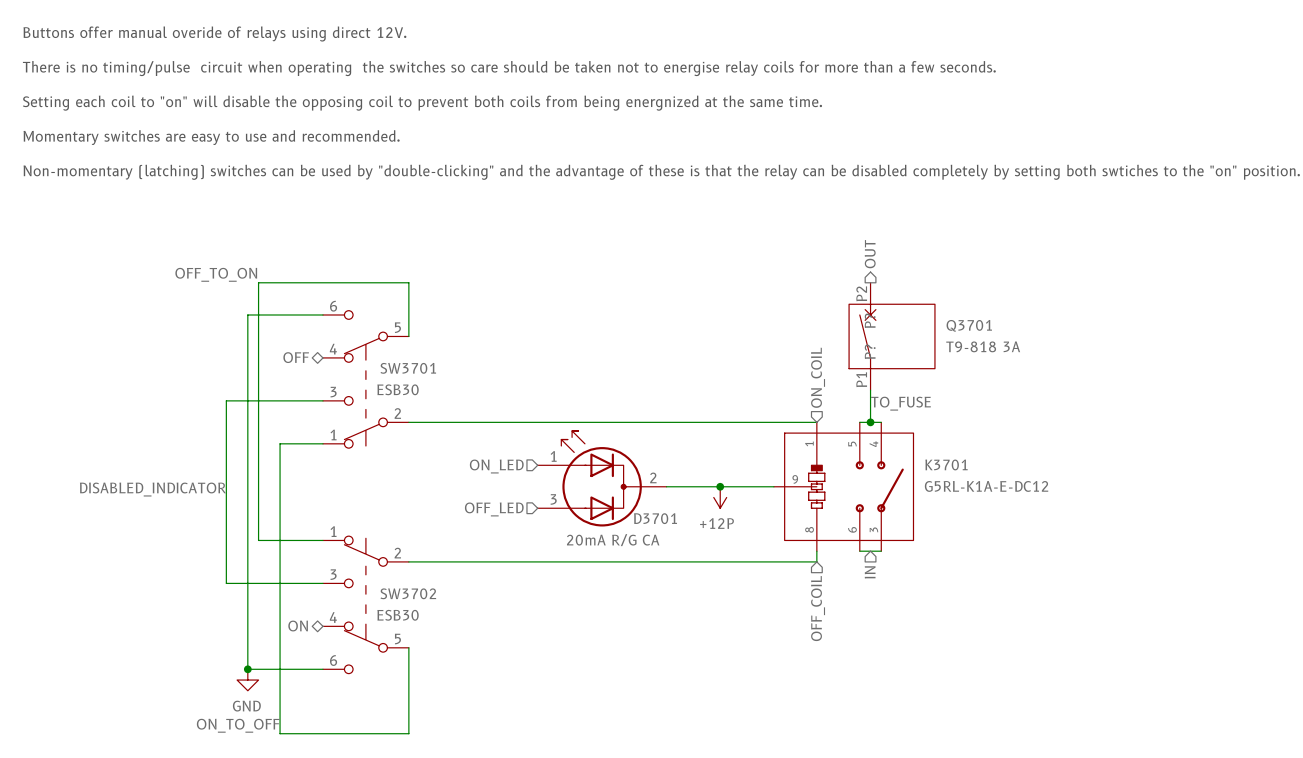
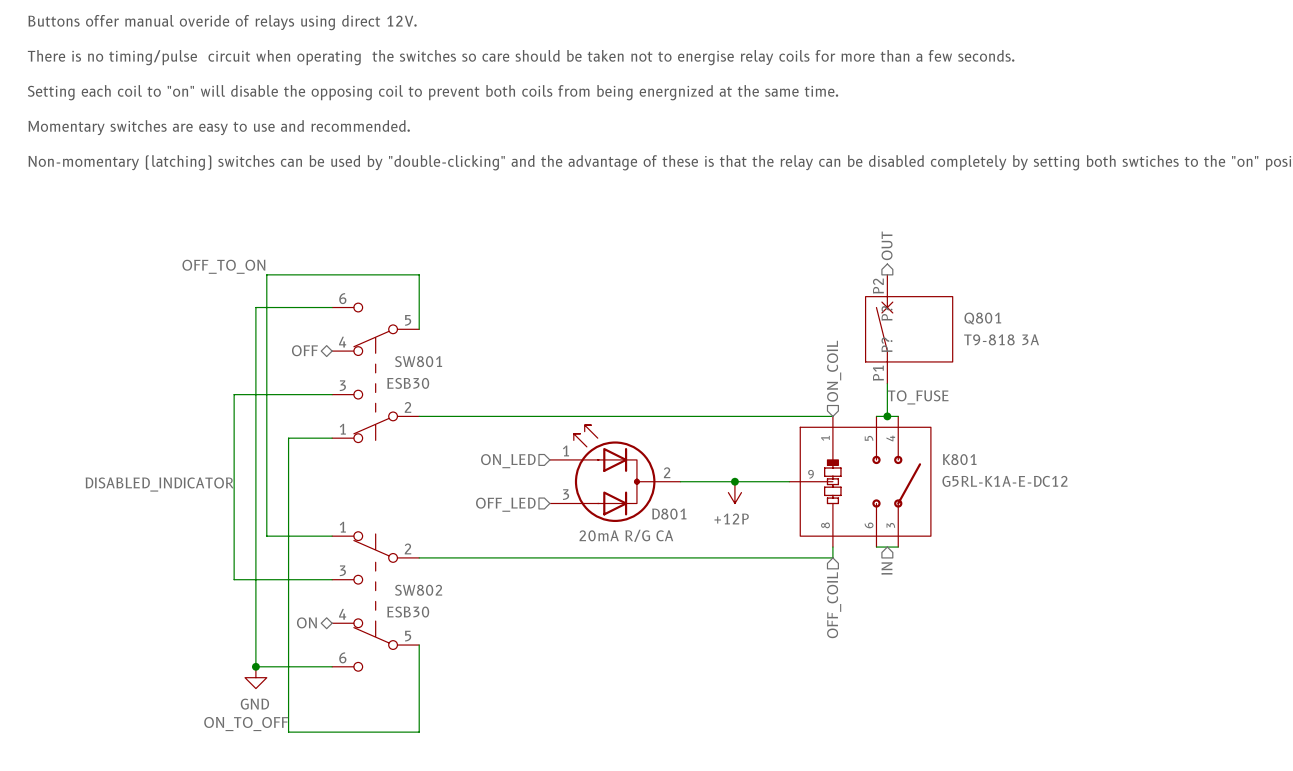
Q3701 name: Q3701 (969, 325) -> Q801 (982, 318)
SW3701 name: SW3701 (408, 368) -> SW801 (418, 361)
K3701 name: K3701 (946, 464) -> K801 (959, 459)
D3701 name: D3701 (655, 518) -> D801 (669, 514)
SW3702 name: SW3702 (408, 593) -> SW802 (418, 590)

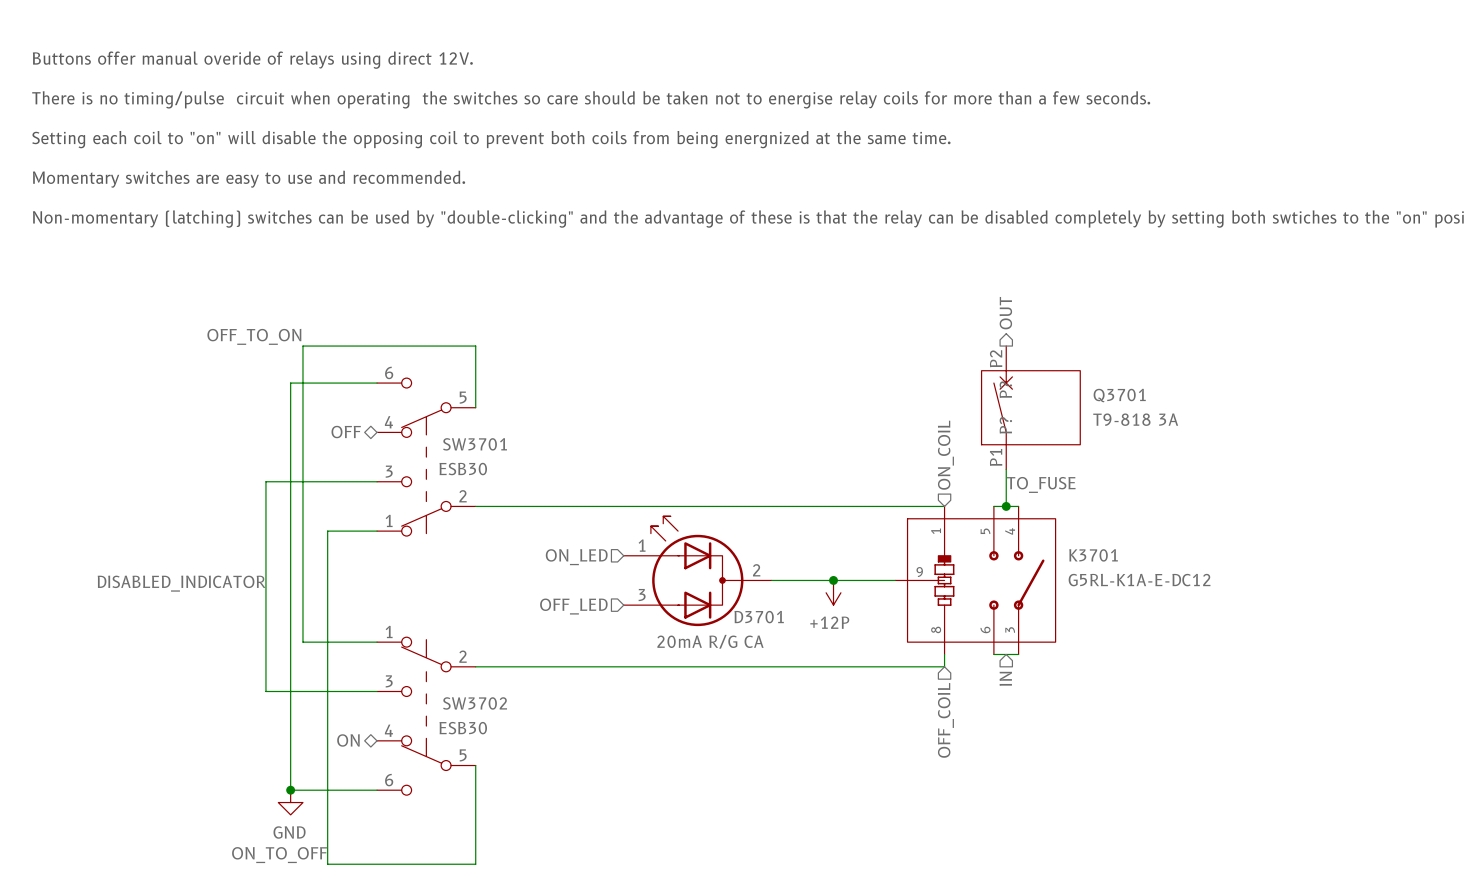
Q801 name: Q801 (982, 318) -> Q3701 (1119, 395)
SW801 name: SW801 (418, 361) -> SW3701 (475, 444)
K801 name: K801 (959, 459) -> K3701 (1093, 555)
D801 name: D801 (669, 514) -> D3701 (759, 617)
SW802 name: SW802 (418, 590) -> SW3702 (475, 703)

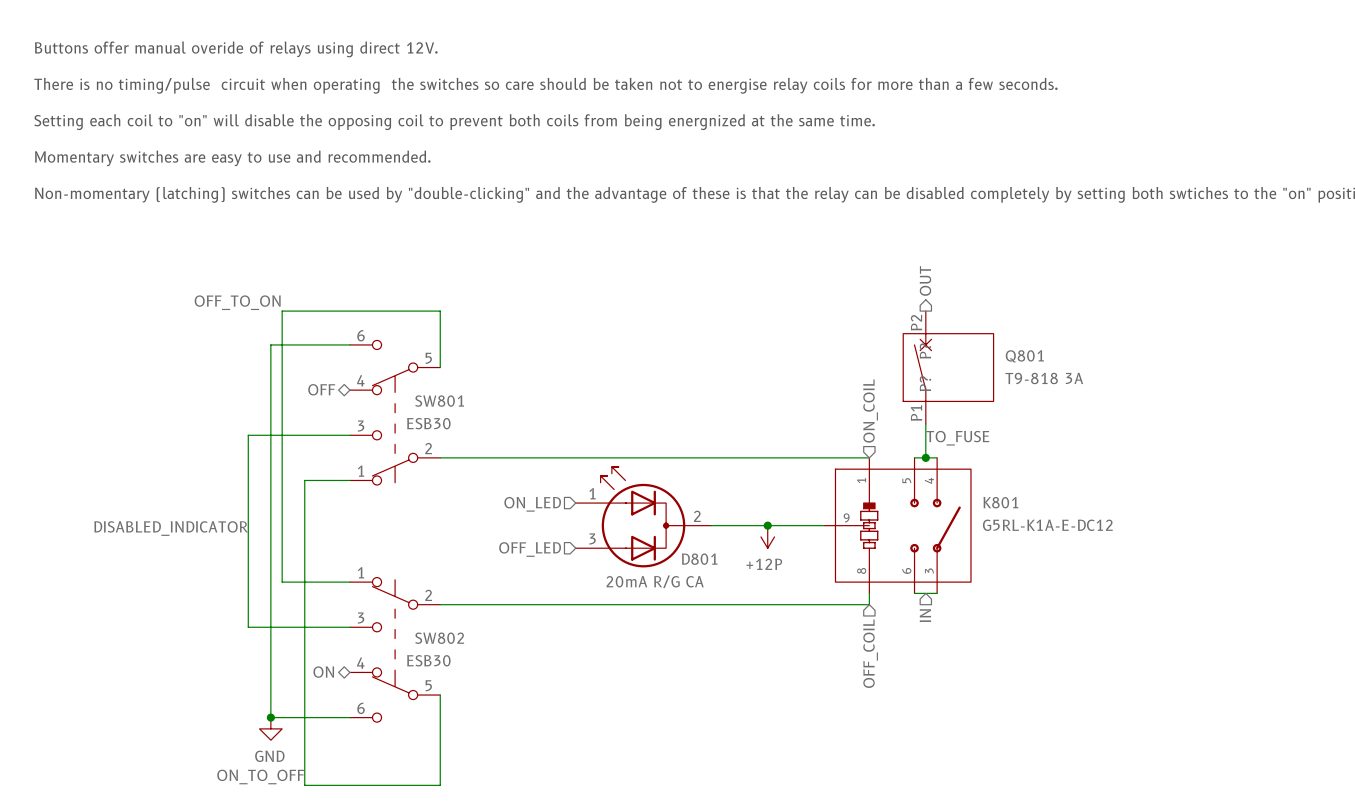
Q3701 name: Q3701 (1119, 395) -> Q801 (1024, 356)
SW3701 name: SW3701 (475, 444) -> SW801 (439, 401)
K3701 name: K3701 (1093, 555) -> K801 (1000, 502)
D3701 name: D3701 (759, 617) -> D801 (699, 559)
SW3702 name: SW3702 (475, 703) -> SW802 (439, 638)

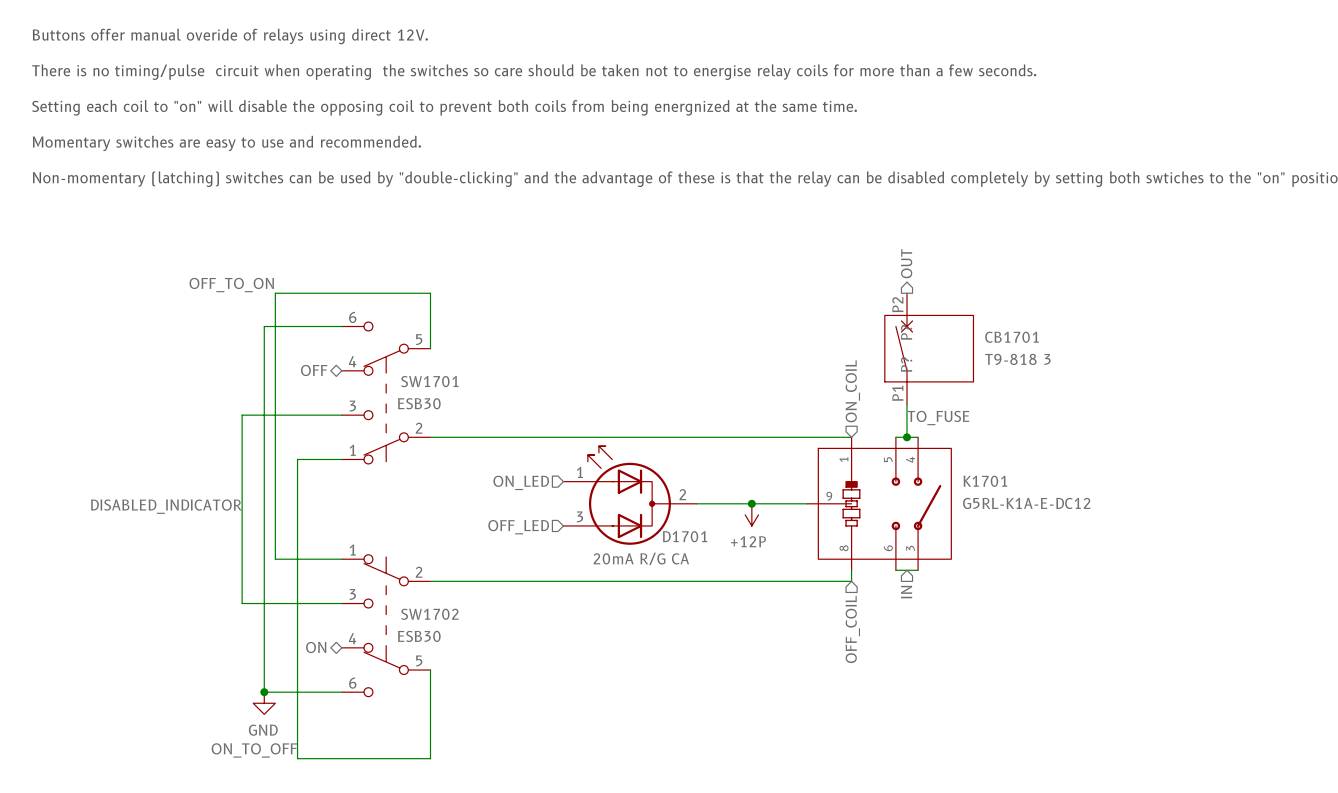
Q801 name: Q801 (1024, 356) -> CB1701 (1012, 337)
Q801 value: T9-818 3A (1044, 378) -> T9-818 3 (1017, 359)
SW801 name: SW801 (439, 401) -> SW1701 (429, 381)
K801 name: K801 (1000, 502) -> K1701 (985, 481)
D801 name: D801 (699, 559) -> D1701 (685, 536)
SW802 name: SW802 (439, 638) -> SW1702 (429, 614)

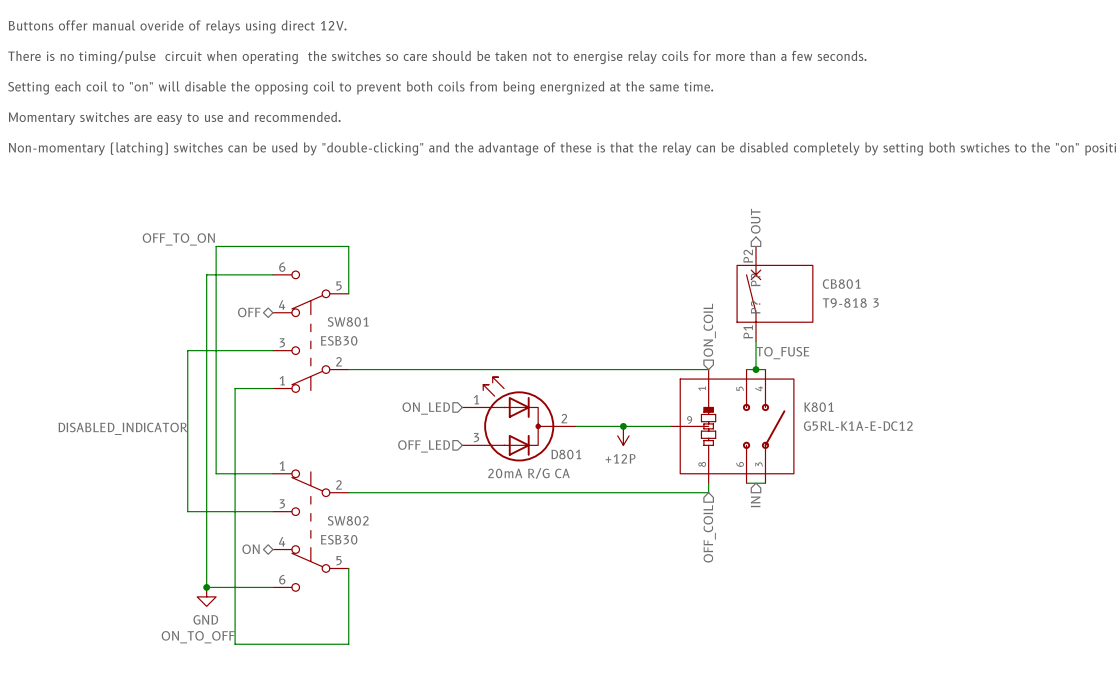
CB1701 name: CB1701 (1012, 337) -> CB801 (841, 284)
SW1701 name: SW1701 (429, 381) -> SW801 (348, 321)
K1701 name: K1701 (985, 481) -> K801 (818, 407)
D1701 name: D1701 (685, 536) -> D801 (566, 454)
SW1702 name: SW1702 (429, 614) -> SW802 (348, 520)

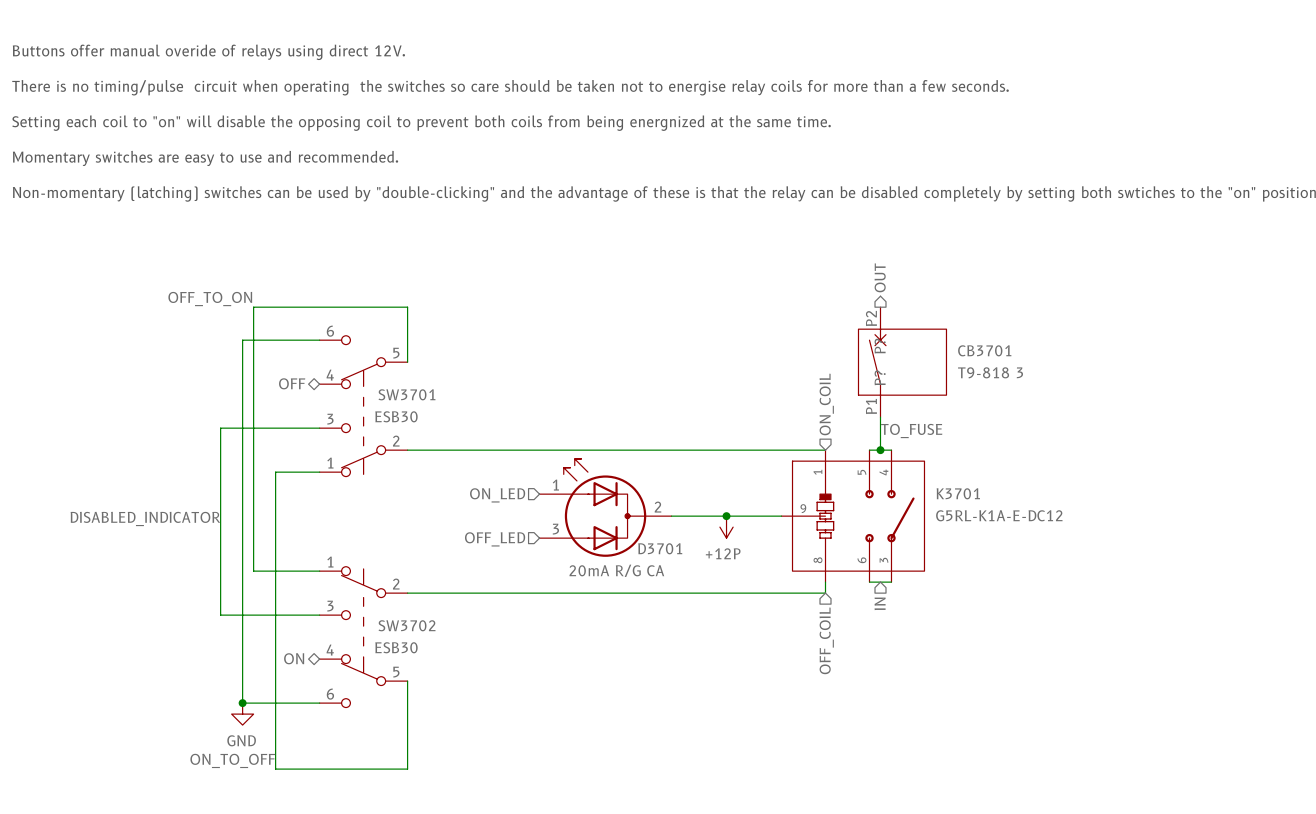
CB801 name: CB801 (841, 284) -> CB3701 (984, 350)
SW801 name: SW801 (348, 321) -> SW3701 (406, 394)
K801 name: K801 (818, 407) -> K3701 (958, 493)
D801 name: D801 (566, 454) -> D3701 (660, 548)
SW802 name: SW802 (348, 520) -> SW3702 (407, 625)

